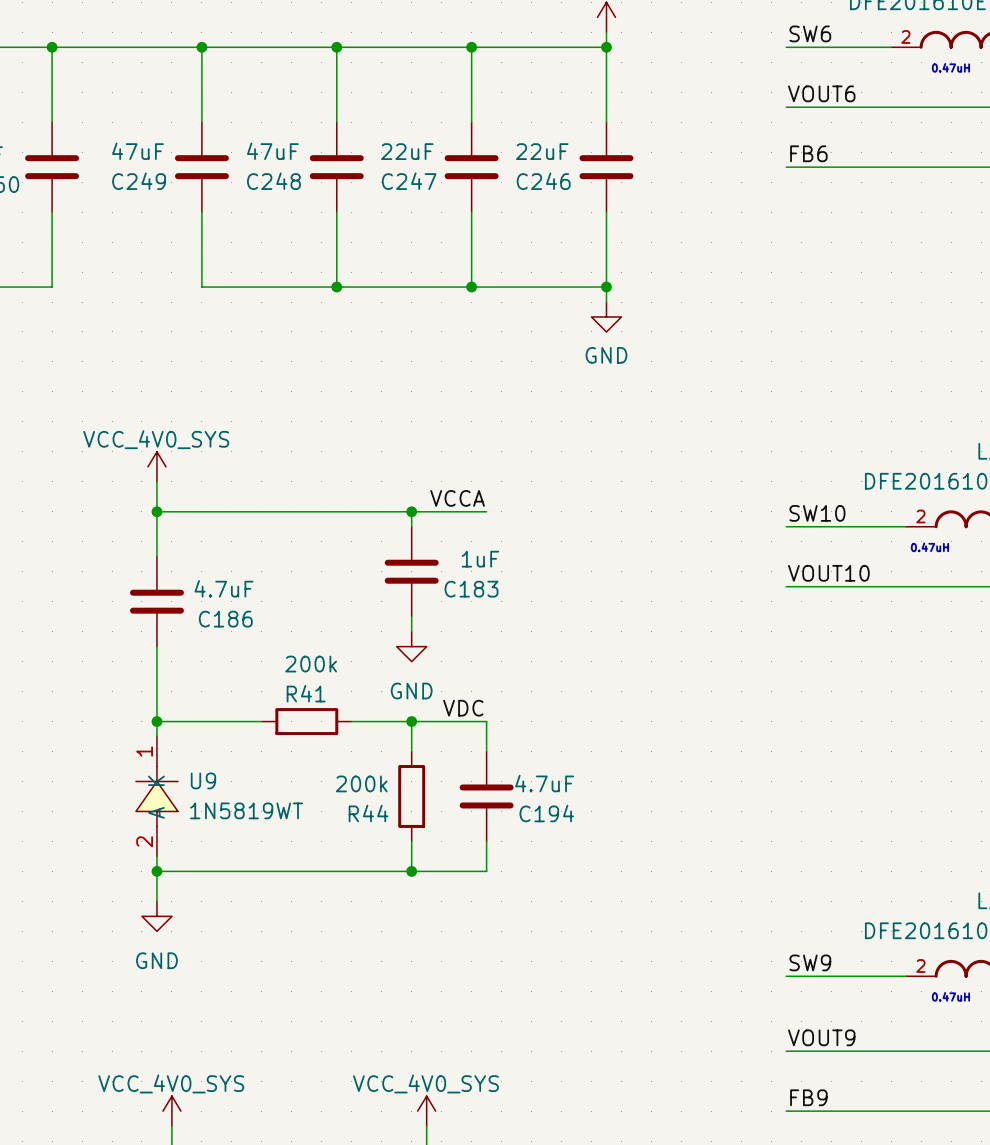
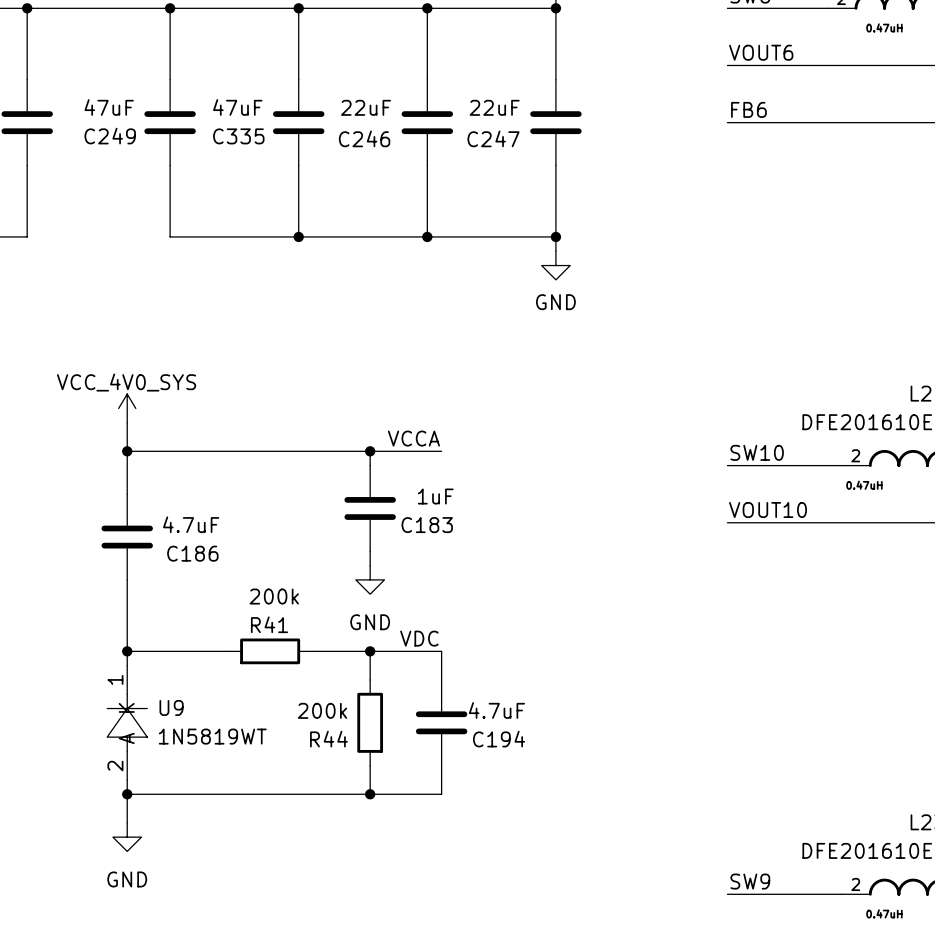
C248 name: C248 (273, 181) -> C335 (238, 136)
C247 name: C247 (409, 181) -> C246 (364, 138)
C246 name: C246 (543, 181) -> C247 (493, 138)

